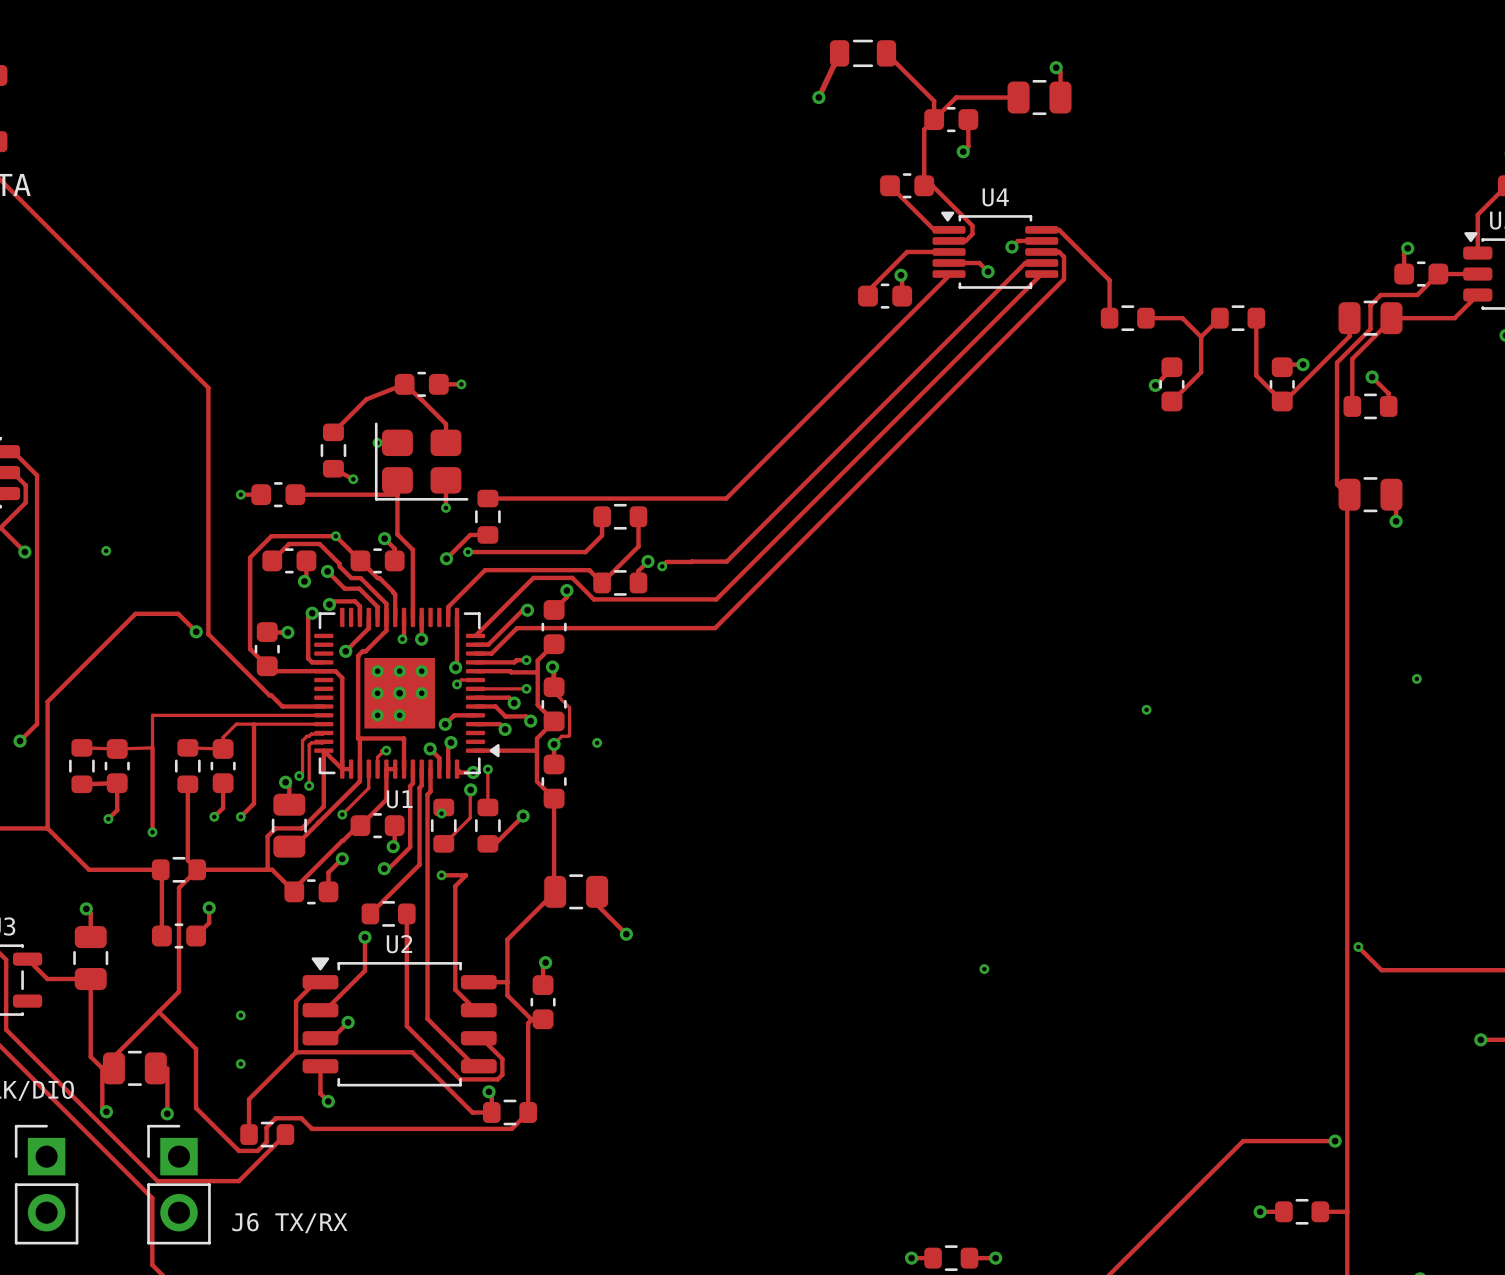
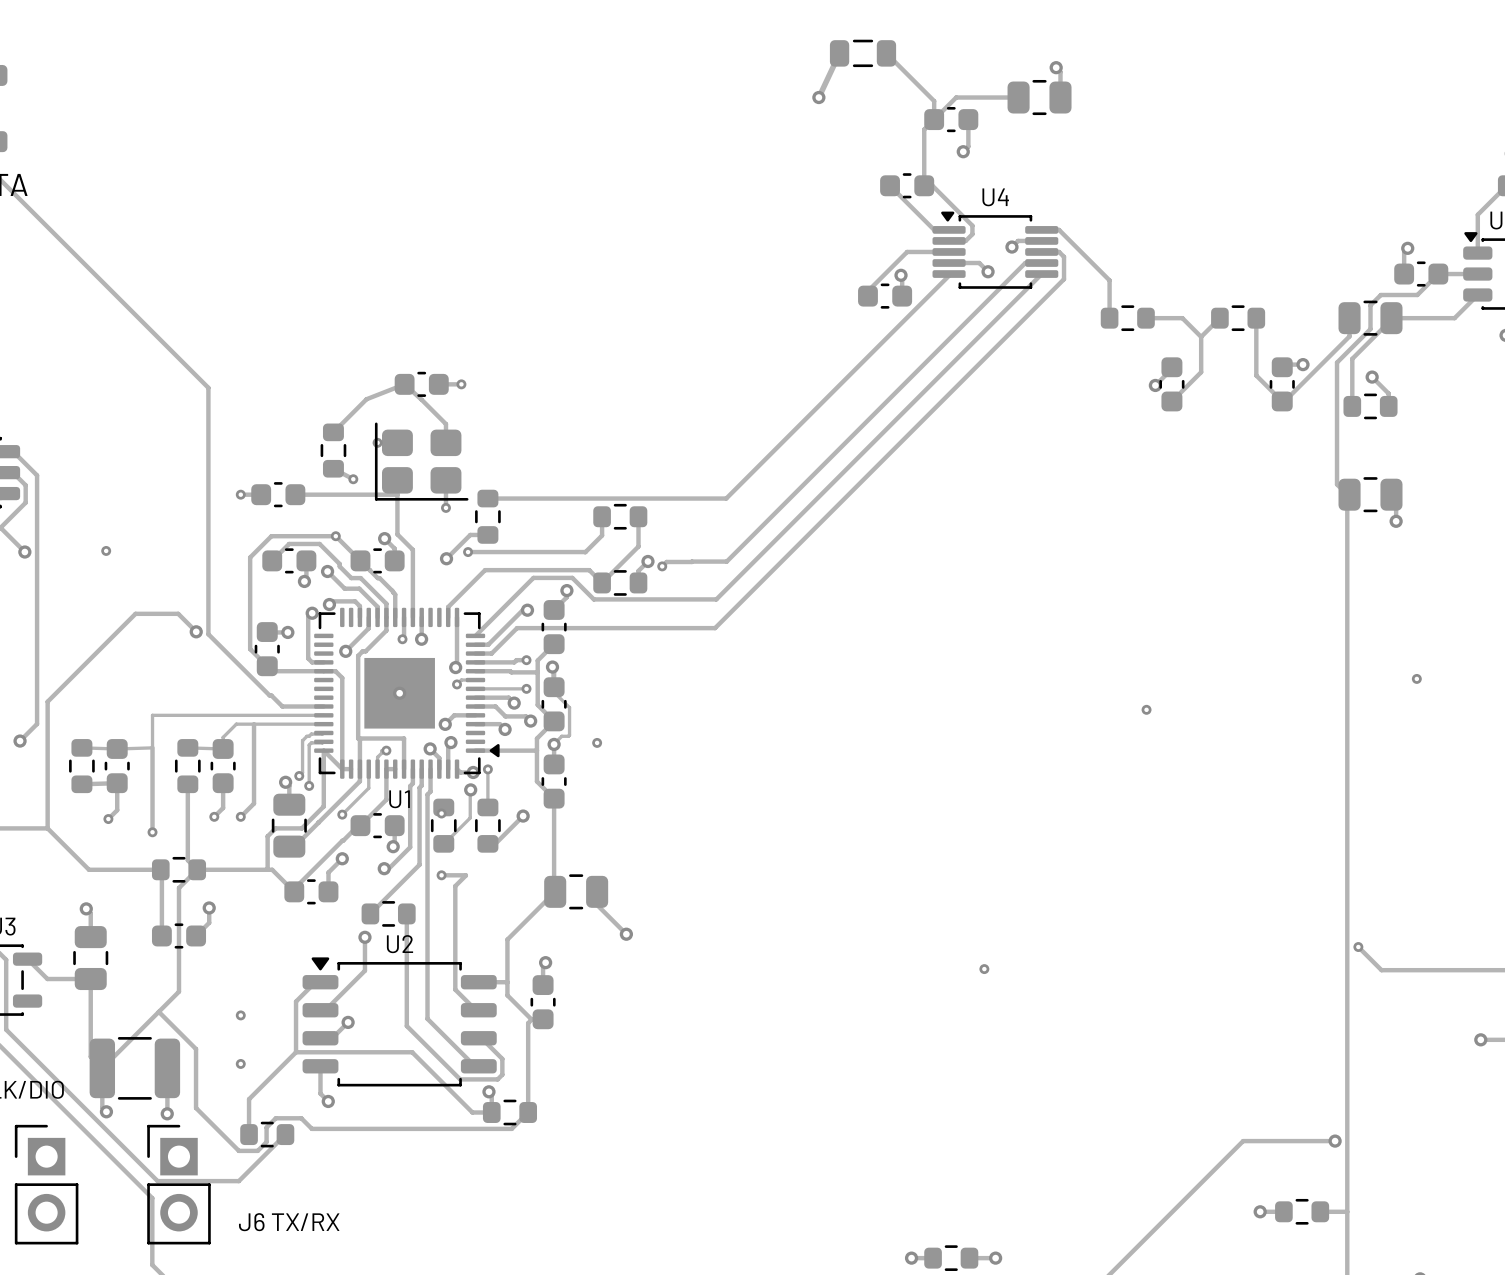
via: (377, 671) -> none
via: (399, 671) -> none
via: (421, 671) -> none
via: (377, 693) -> none
via: (421, 693) -> none
via: (377, 715) -> none
via: (399, 715) -> none
part footprint: [102, 1050, 167, 1086] -> [89, 1037, 181, 1100]

